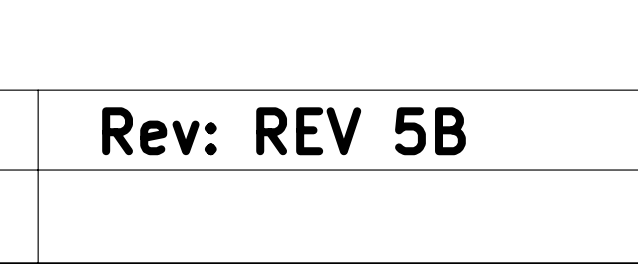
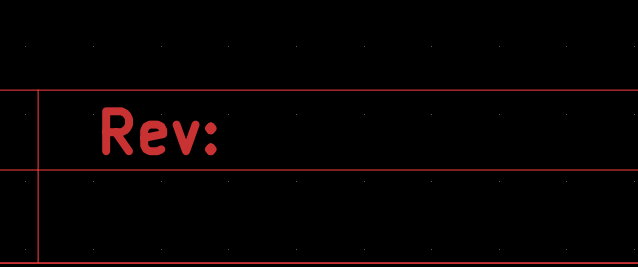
title block: Rev: REV 5B (284, 131) -> Rev: (159, 131)

